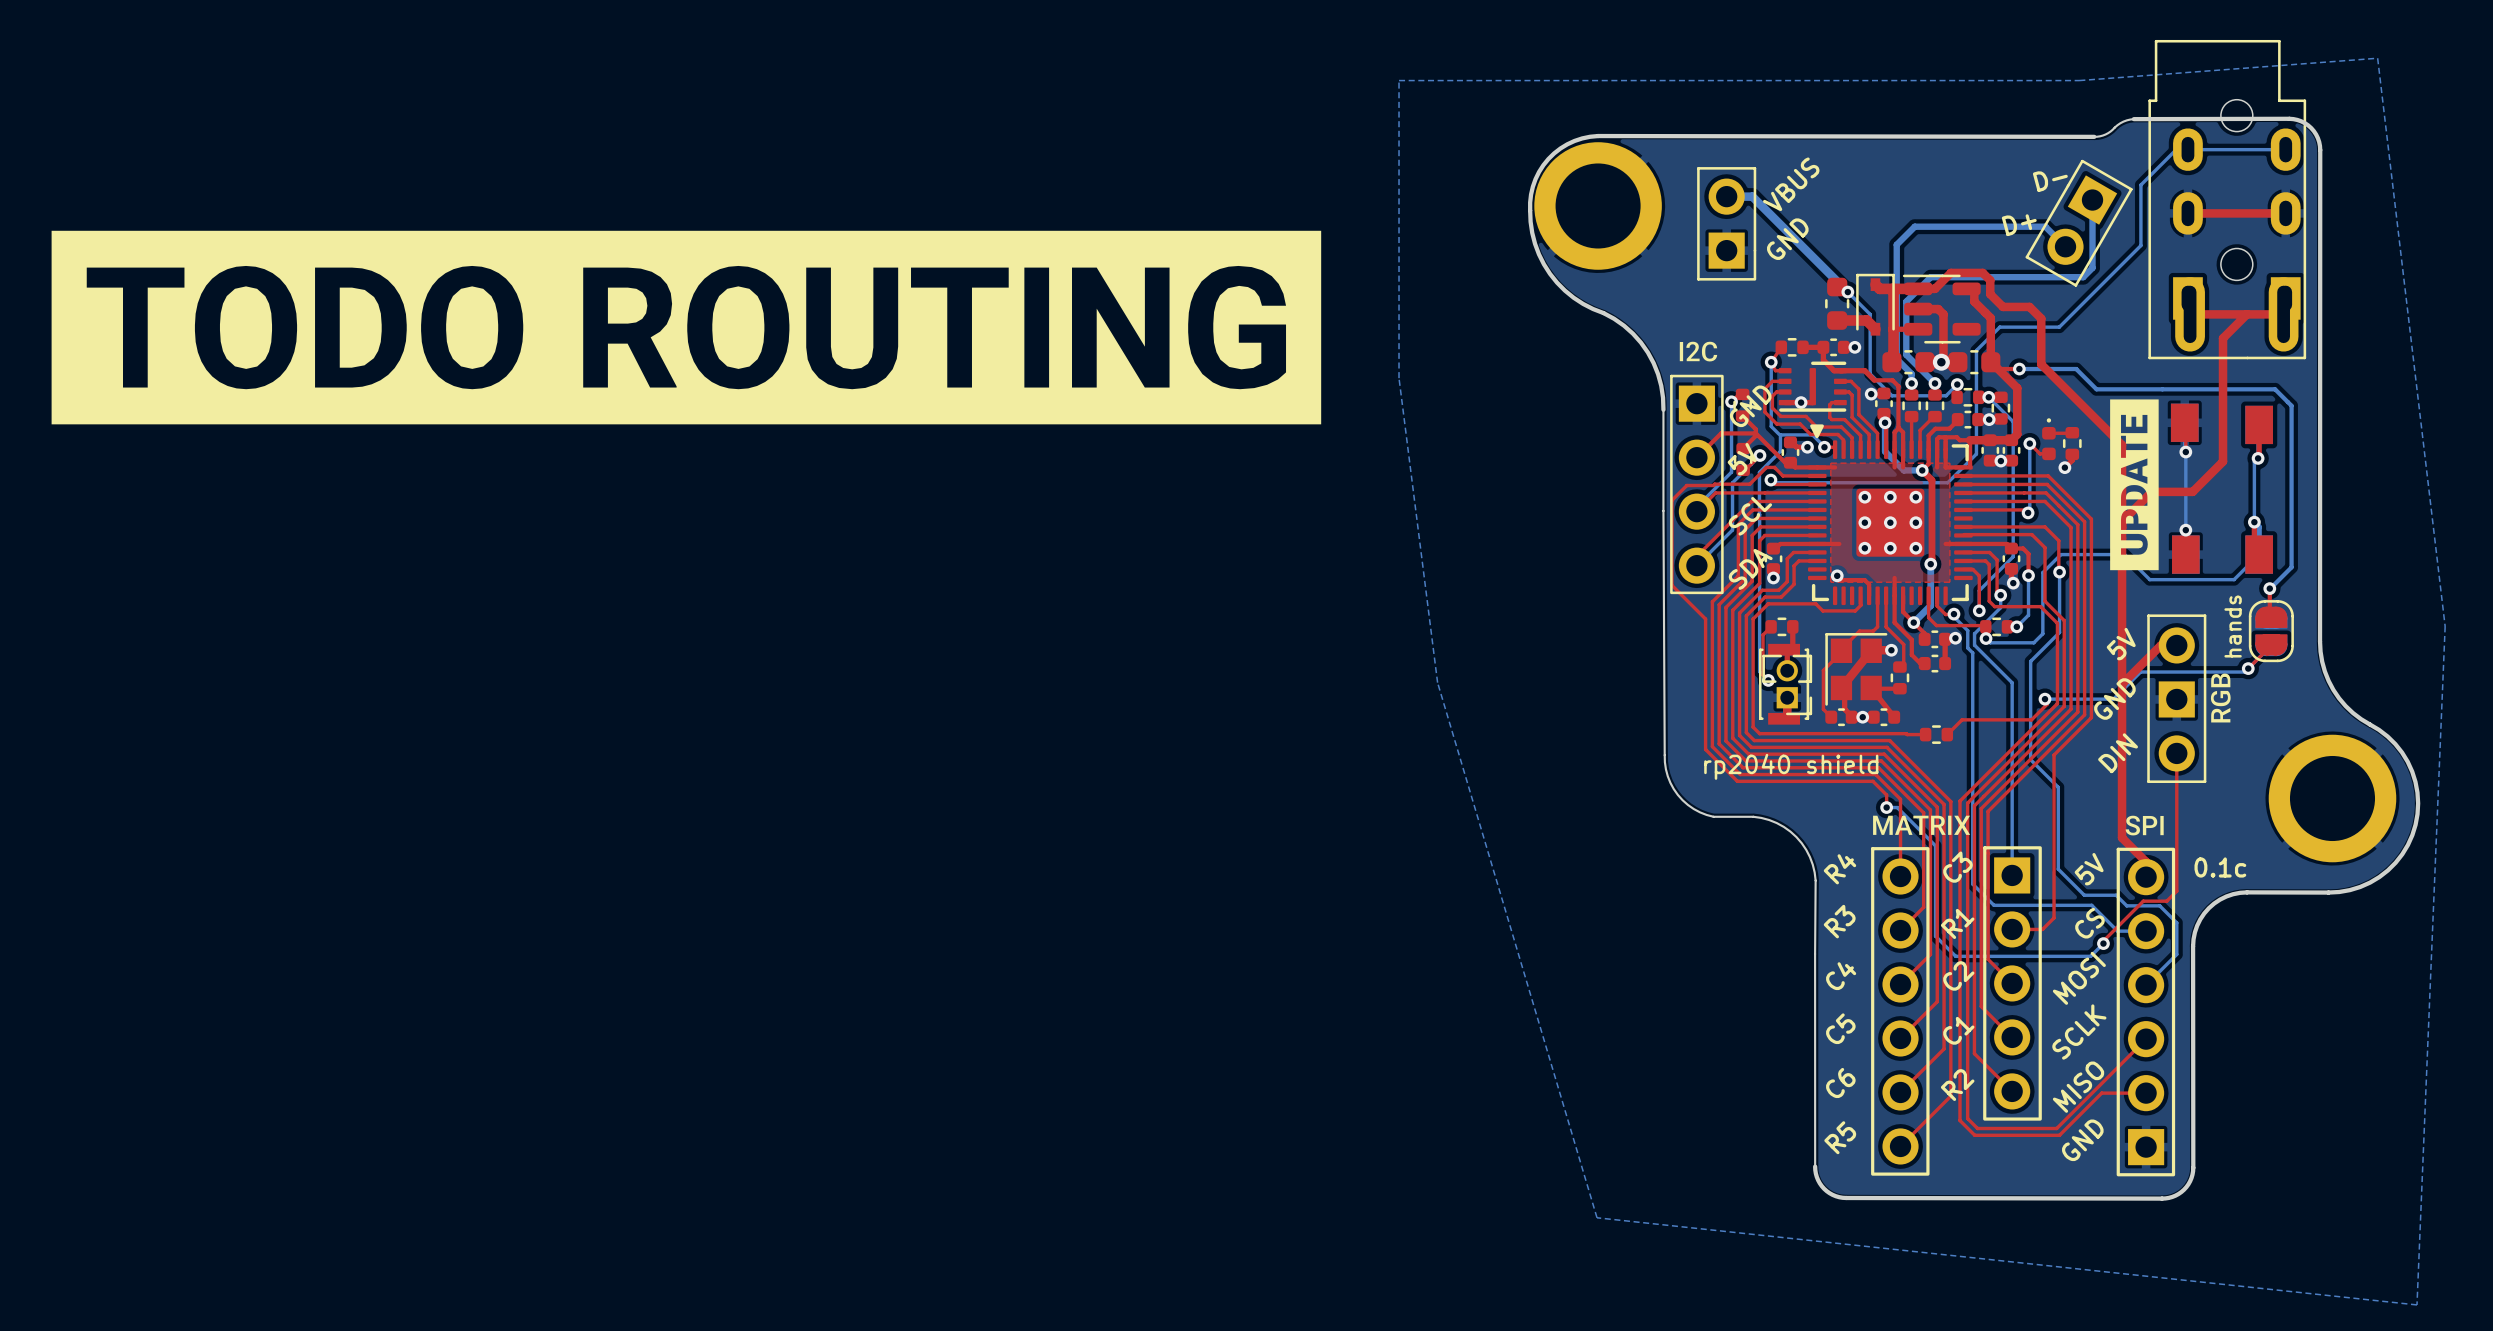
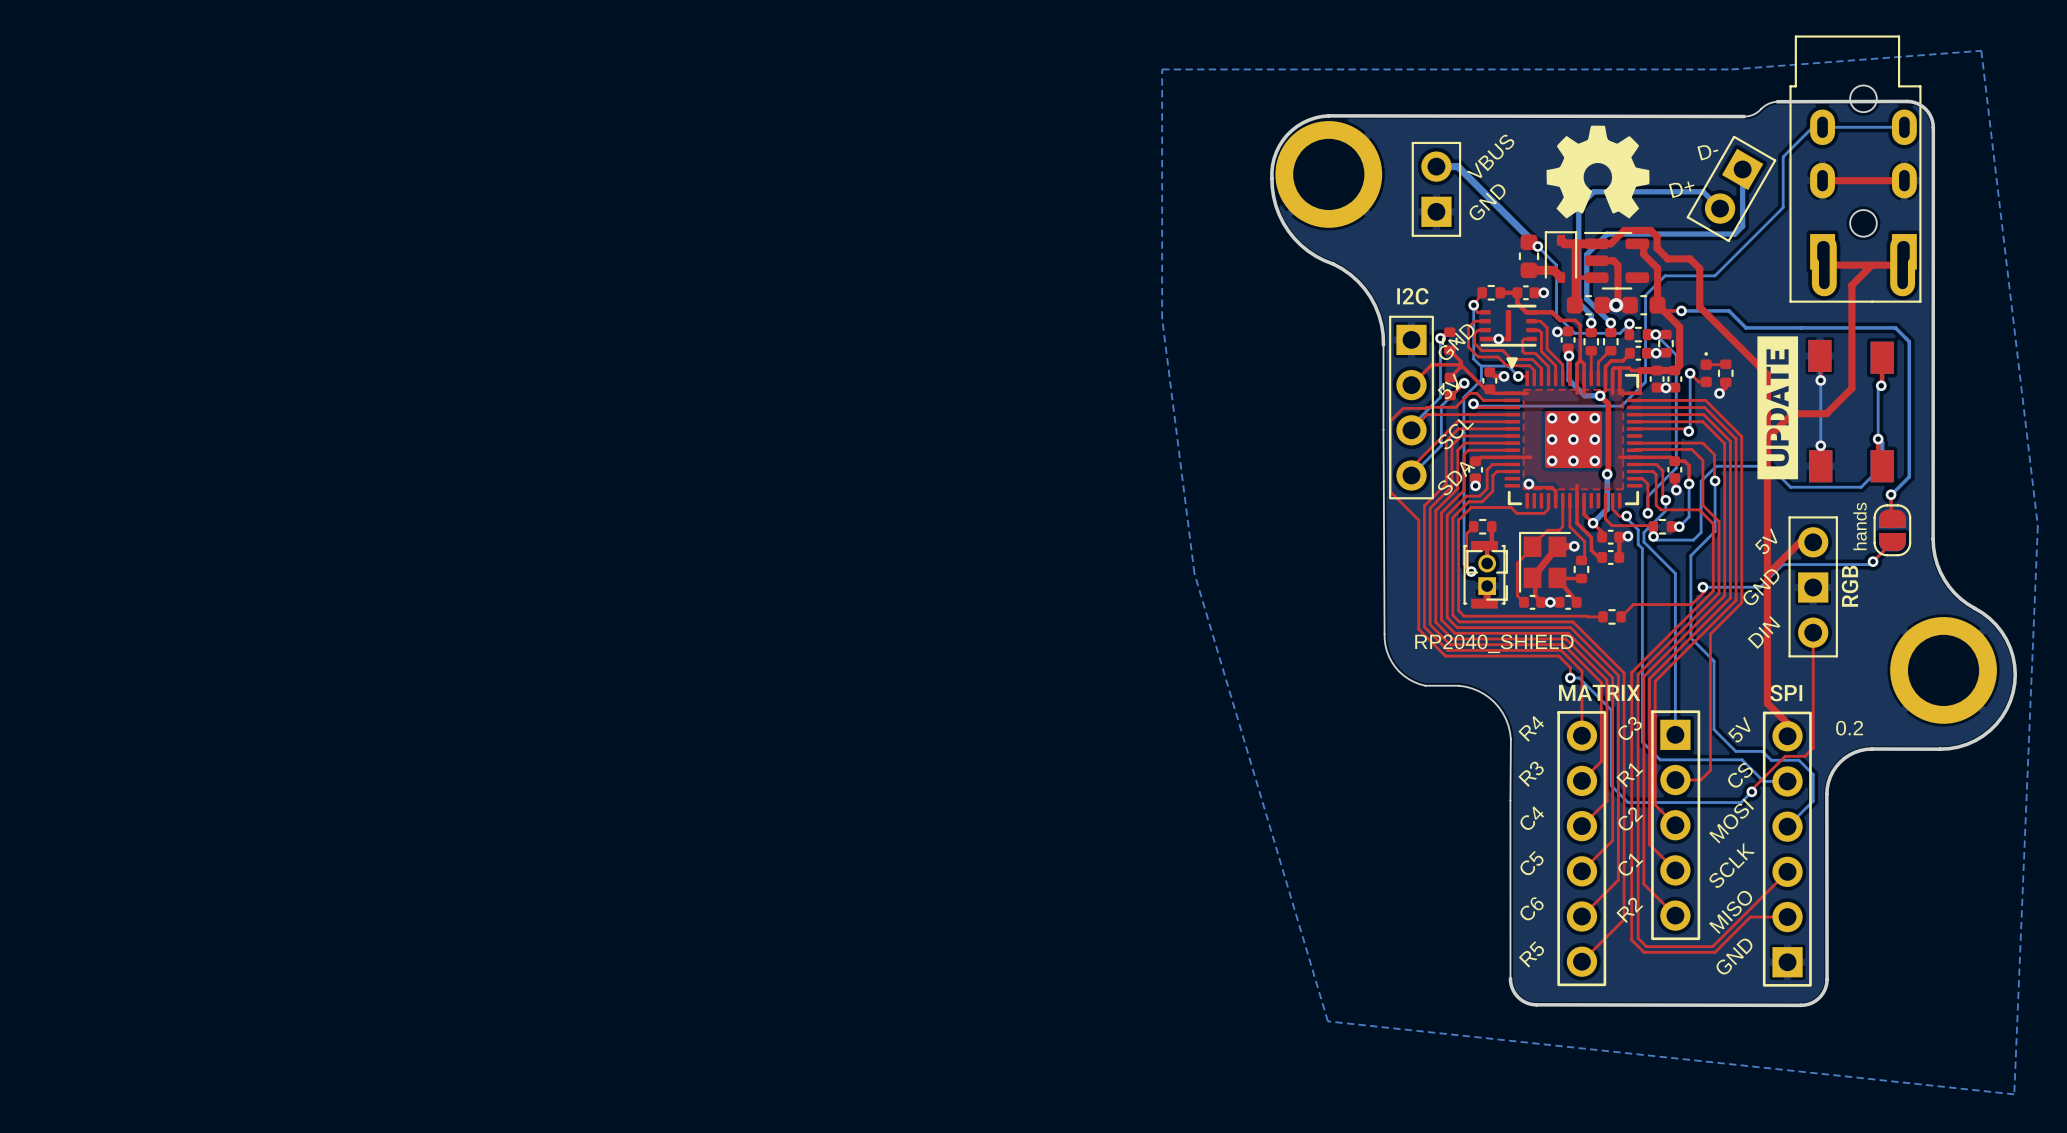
drawing: none -> [1546, 125, 1650, 219]
drawing: [51, 230, 1322, 425] -> none
text: rp2040 shield (1791, 766) -> RP2040_SHIELD (1494, 643)
text: 0.1c (2220, 867) -> 0.2 (1849, 728)

